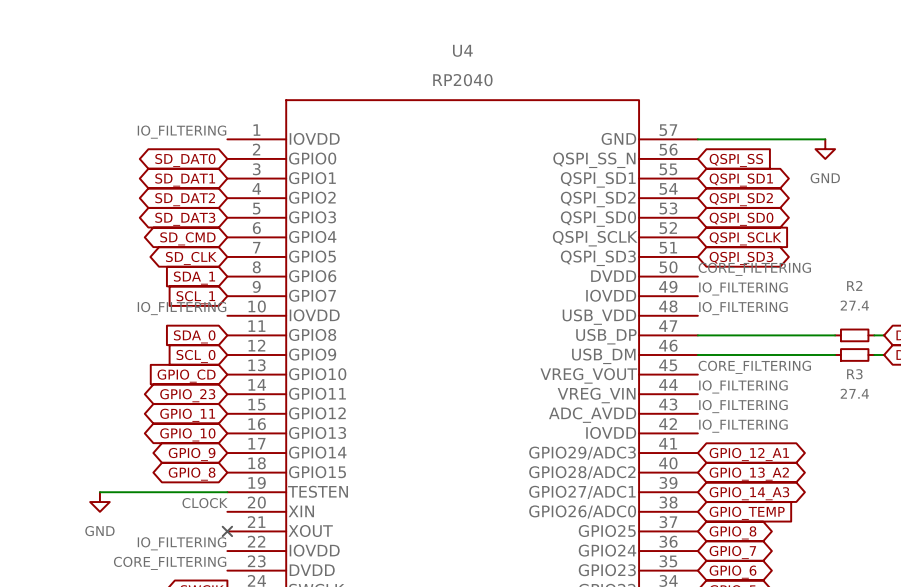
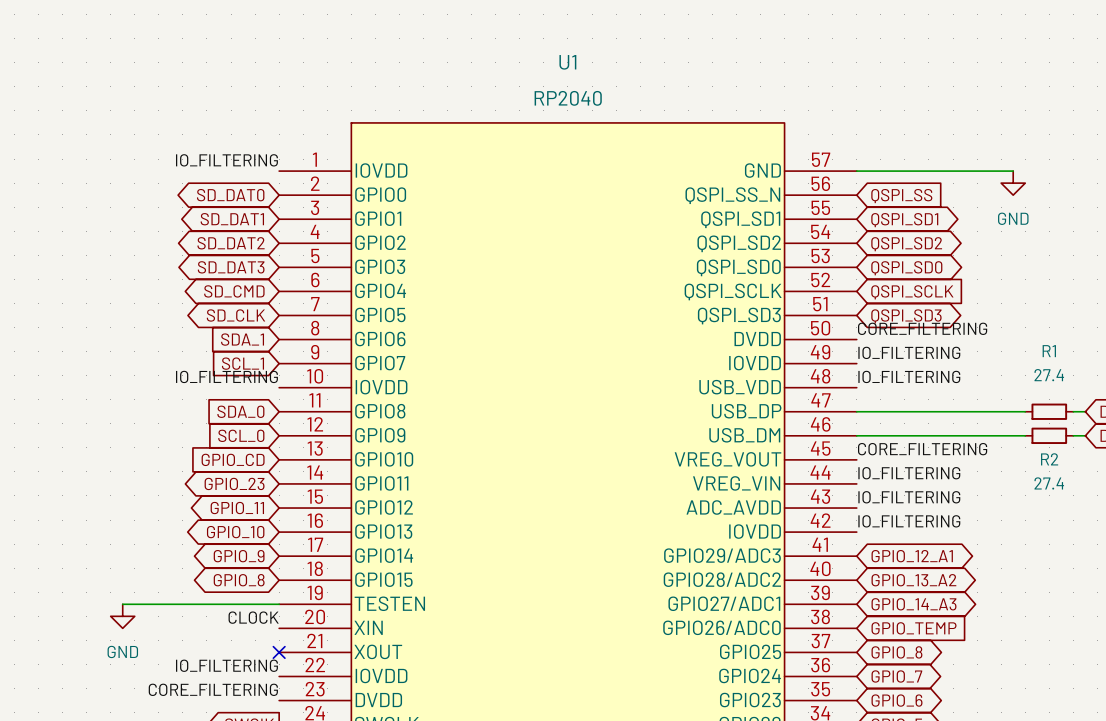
U4 name: U4 (462, 50) -> U1 (567, 62)
R2 name: R2 (854, 285) -> R1 (1049, 351)
R3 name: R3 (854, 374) -> R2 (1049, 459)

